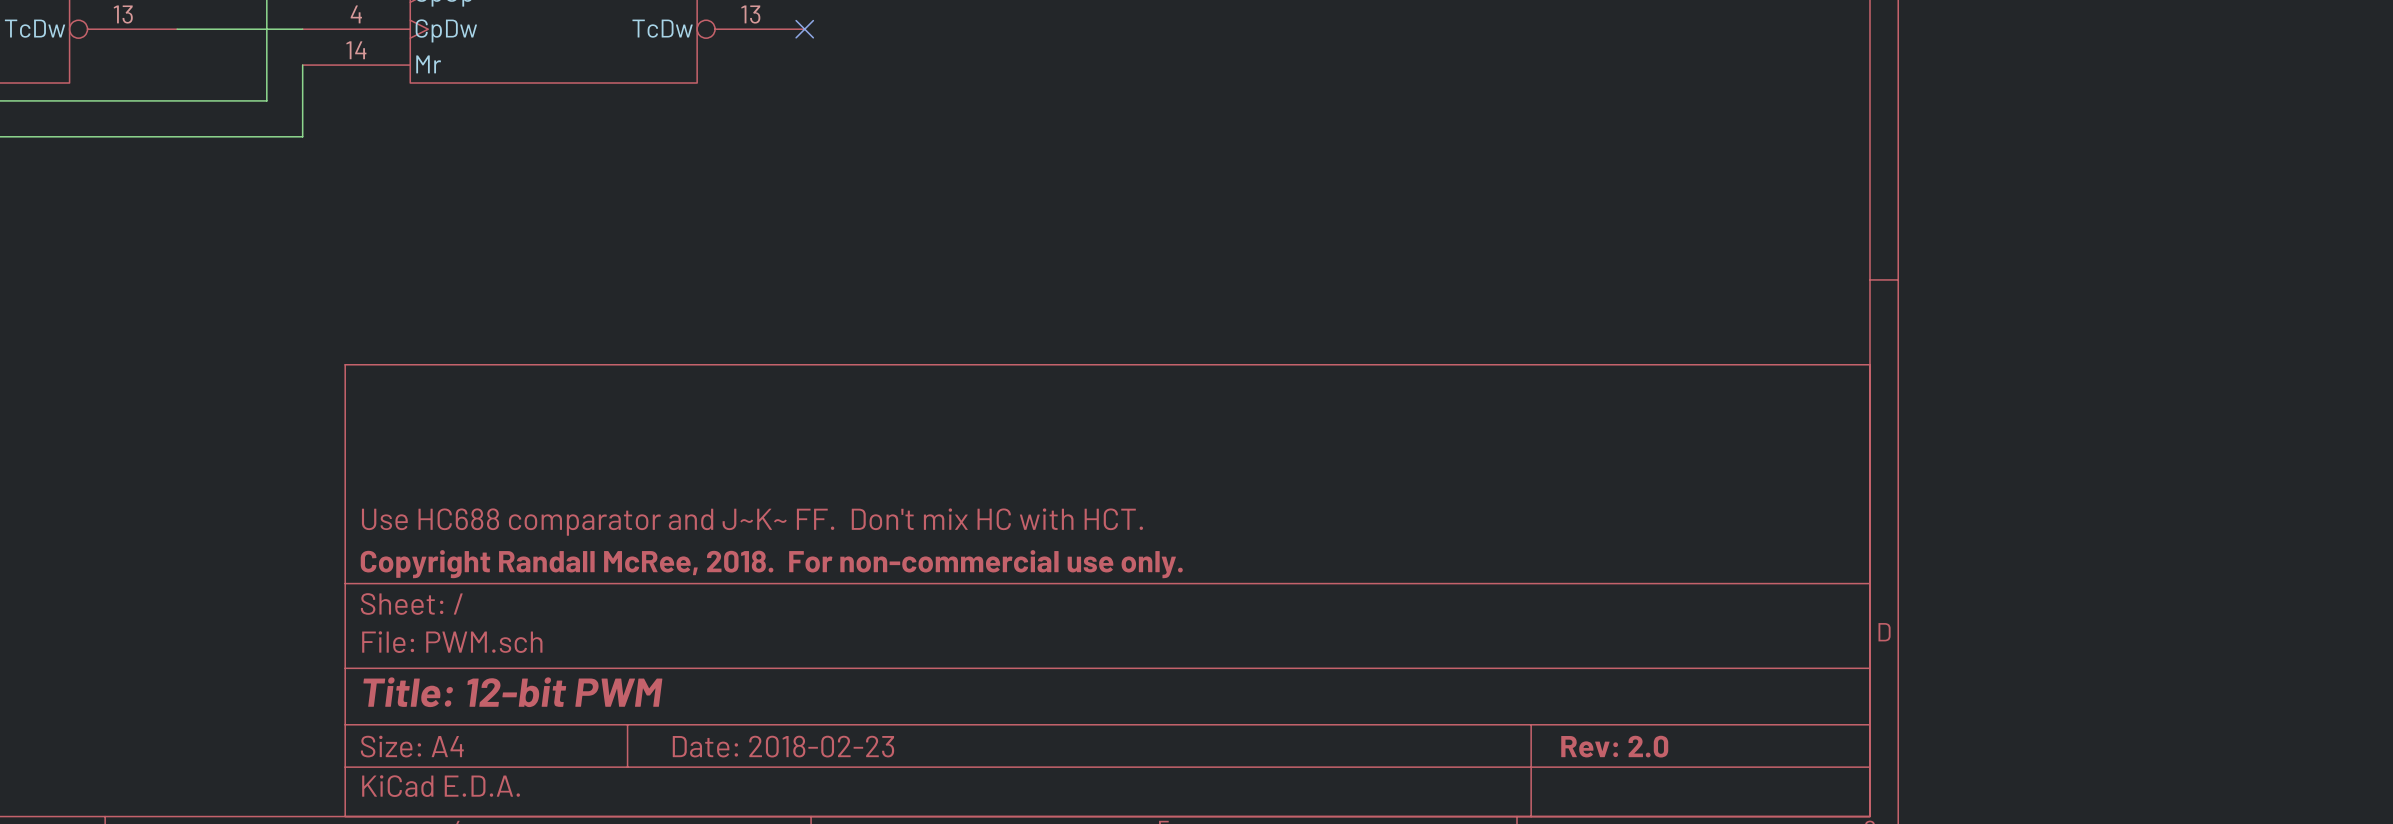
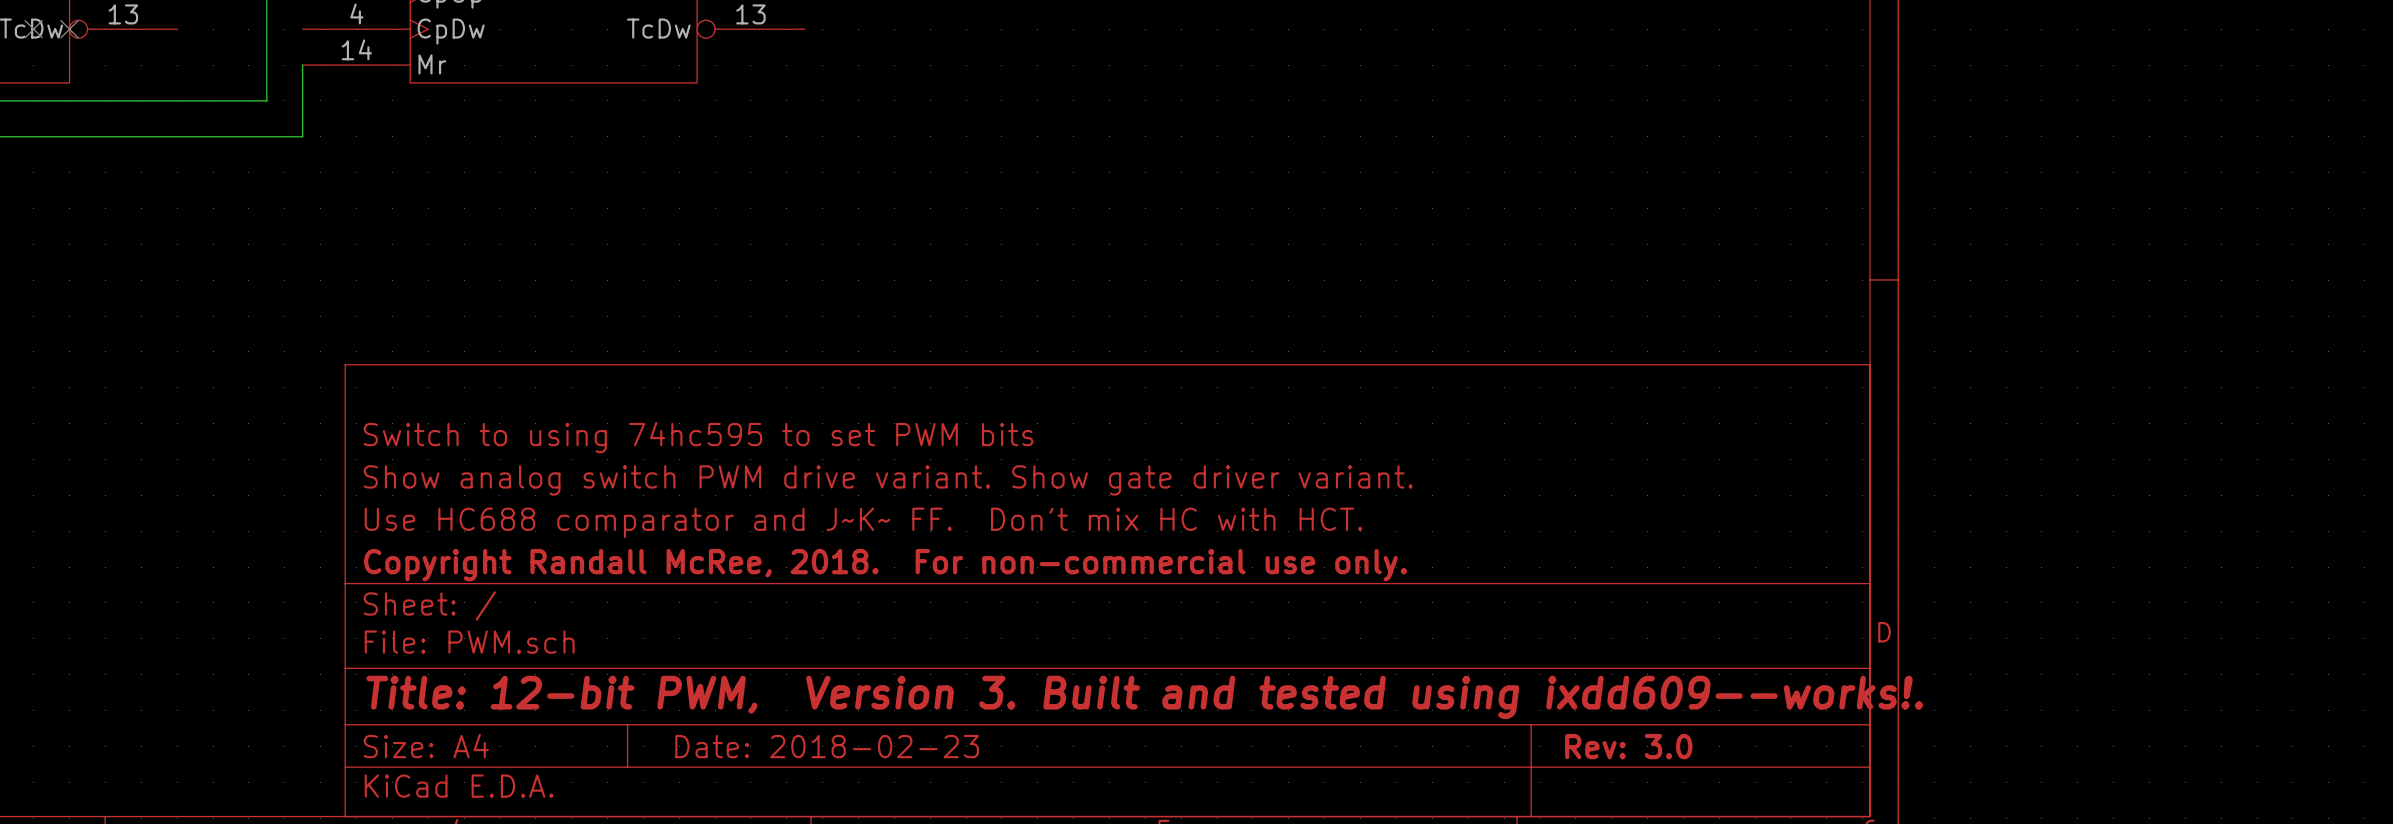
no-connect mark: none -> (33, 29)
no-connect mark: none -> (69, 29)
wire: (177, 29) (302, 29) -> none
no-connect mark: (804, 29) -> none
title block: none -> Switch to using 74hc595 to set PWM bits (698, 437)
title block: none -> Show analog switch PWM drive variant. Show gate driver variant. (888, 480)
title block: Title: 12-bit PWM (512, 692) -> Title: 12-bit PWM, Version 3. Built and tested using ixdd609--works!. (1144, 697)
title block: Rev: 2.0 (1614, 746) -> Rev: 3.0 (1628, 746)

